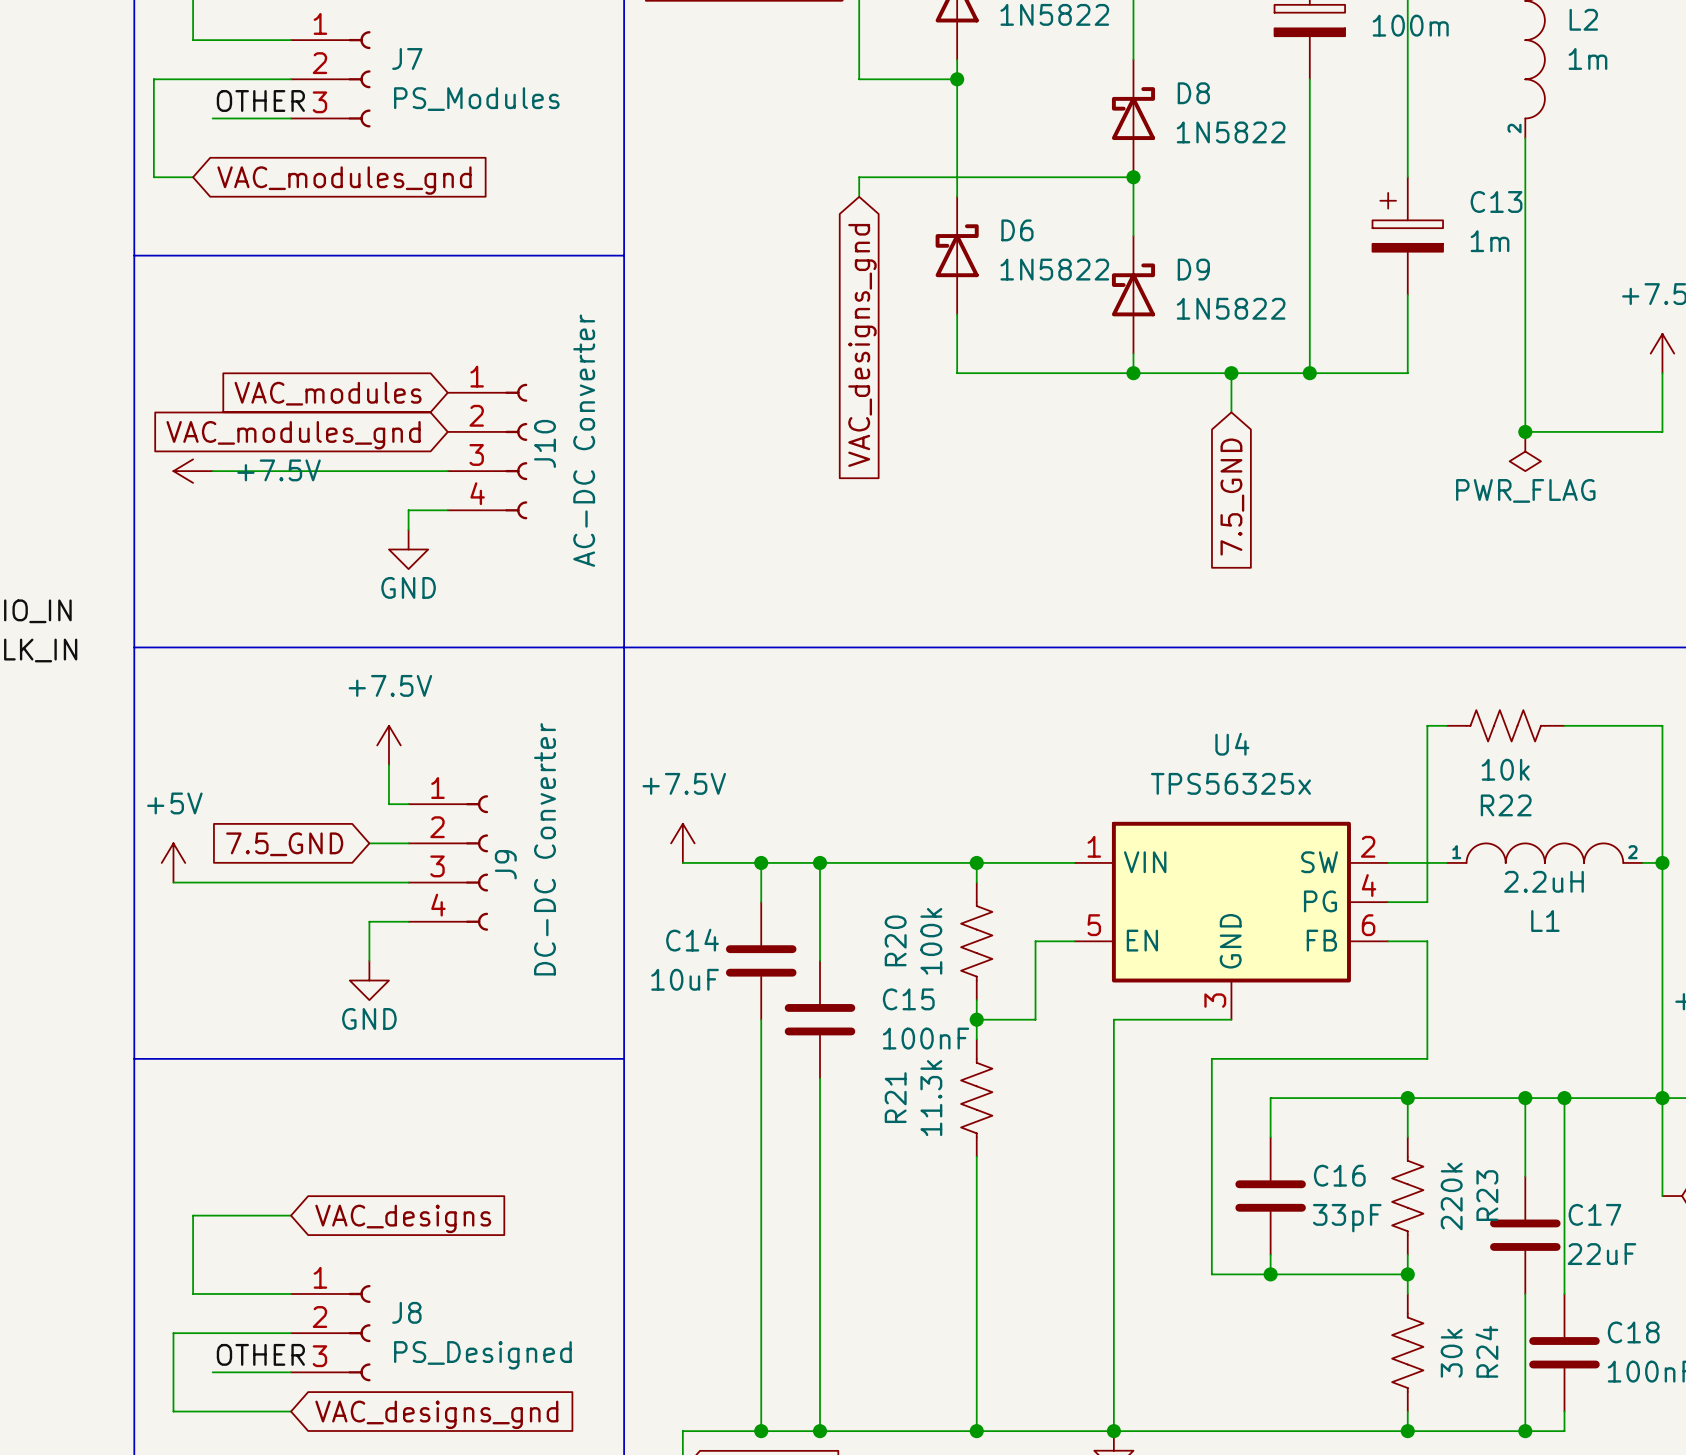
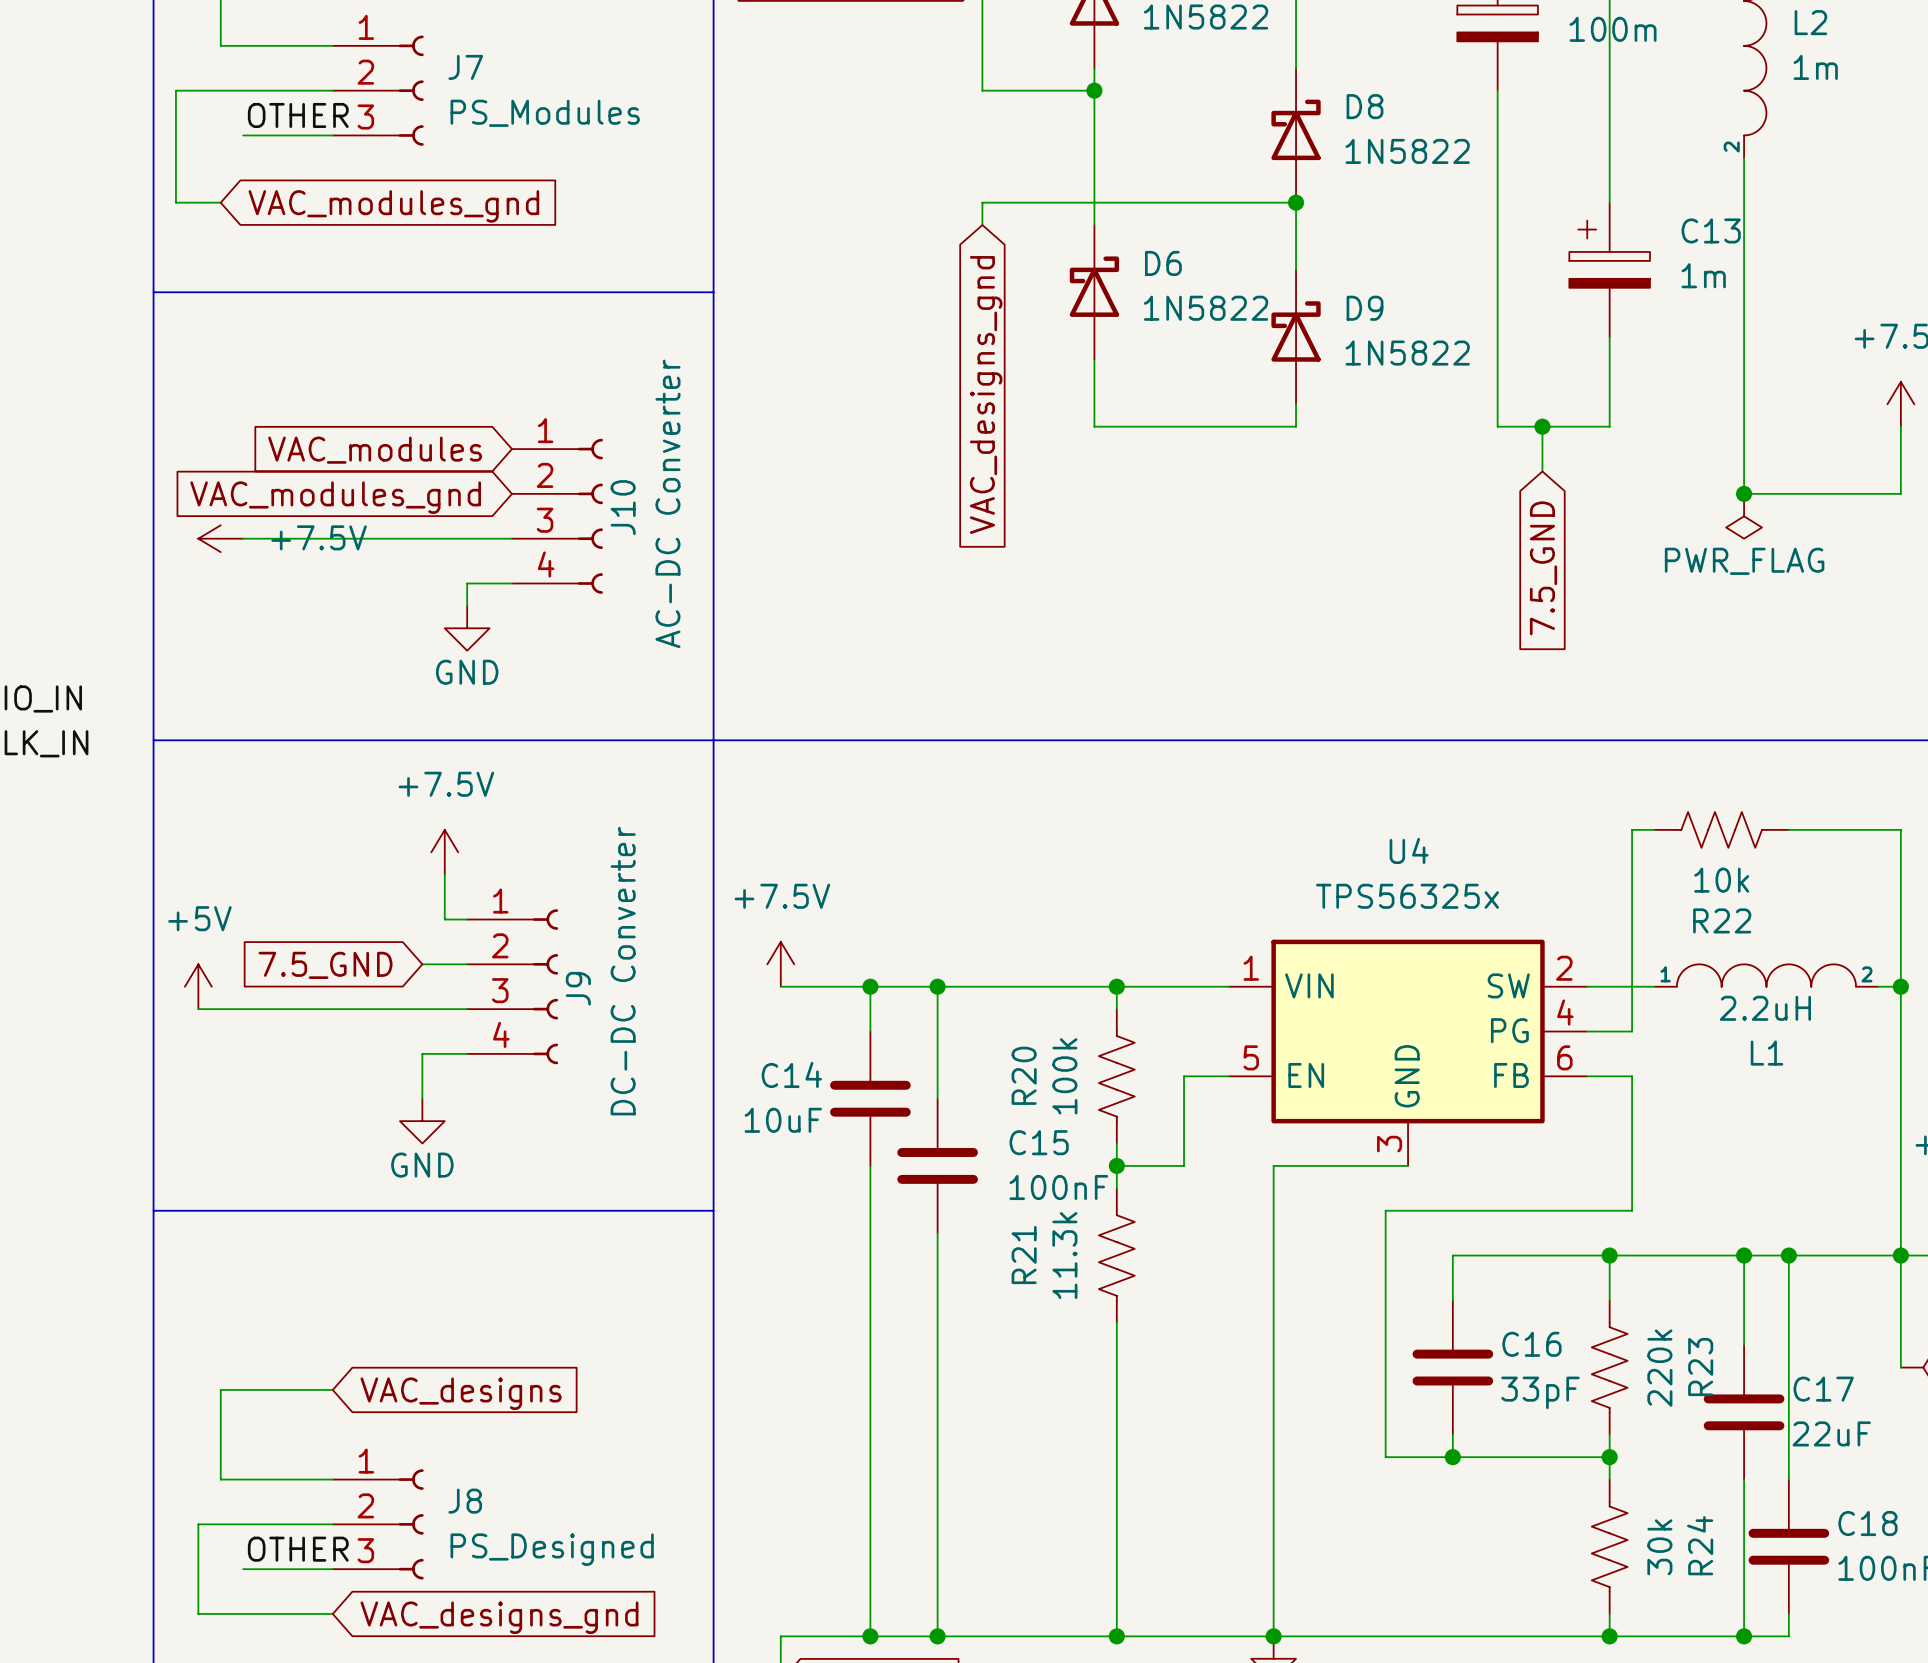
wire: (1133, 373) (1309, 373) -> none
junction: (1133, 373) -> none
wire: (1231, 373) (1231, 412) -> (1542, 426) (1542, 471)
junction: (1231, 373) -> none
junction position: (1309, 373) -> (1542, 426)
global label position: 7.5_GND (1232, 497) -> 7.5_GND (1543, 568)

